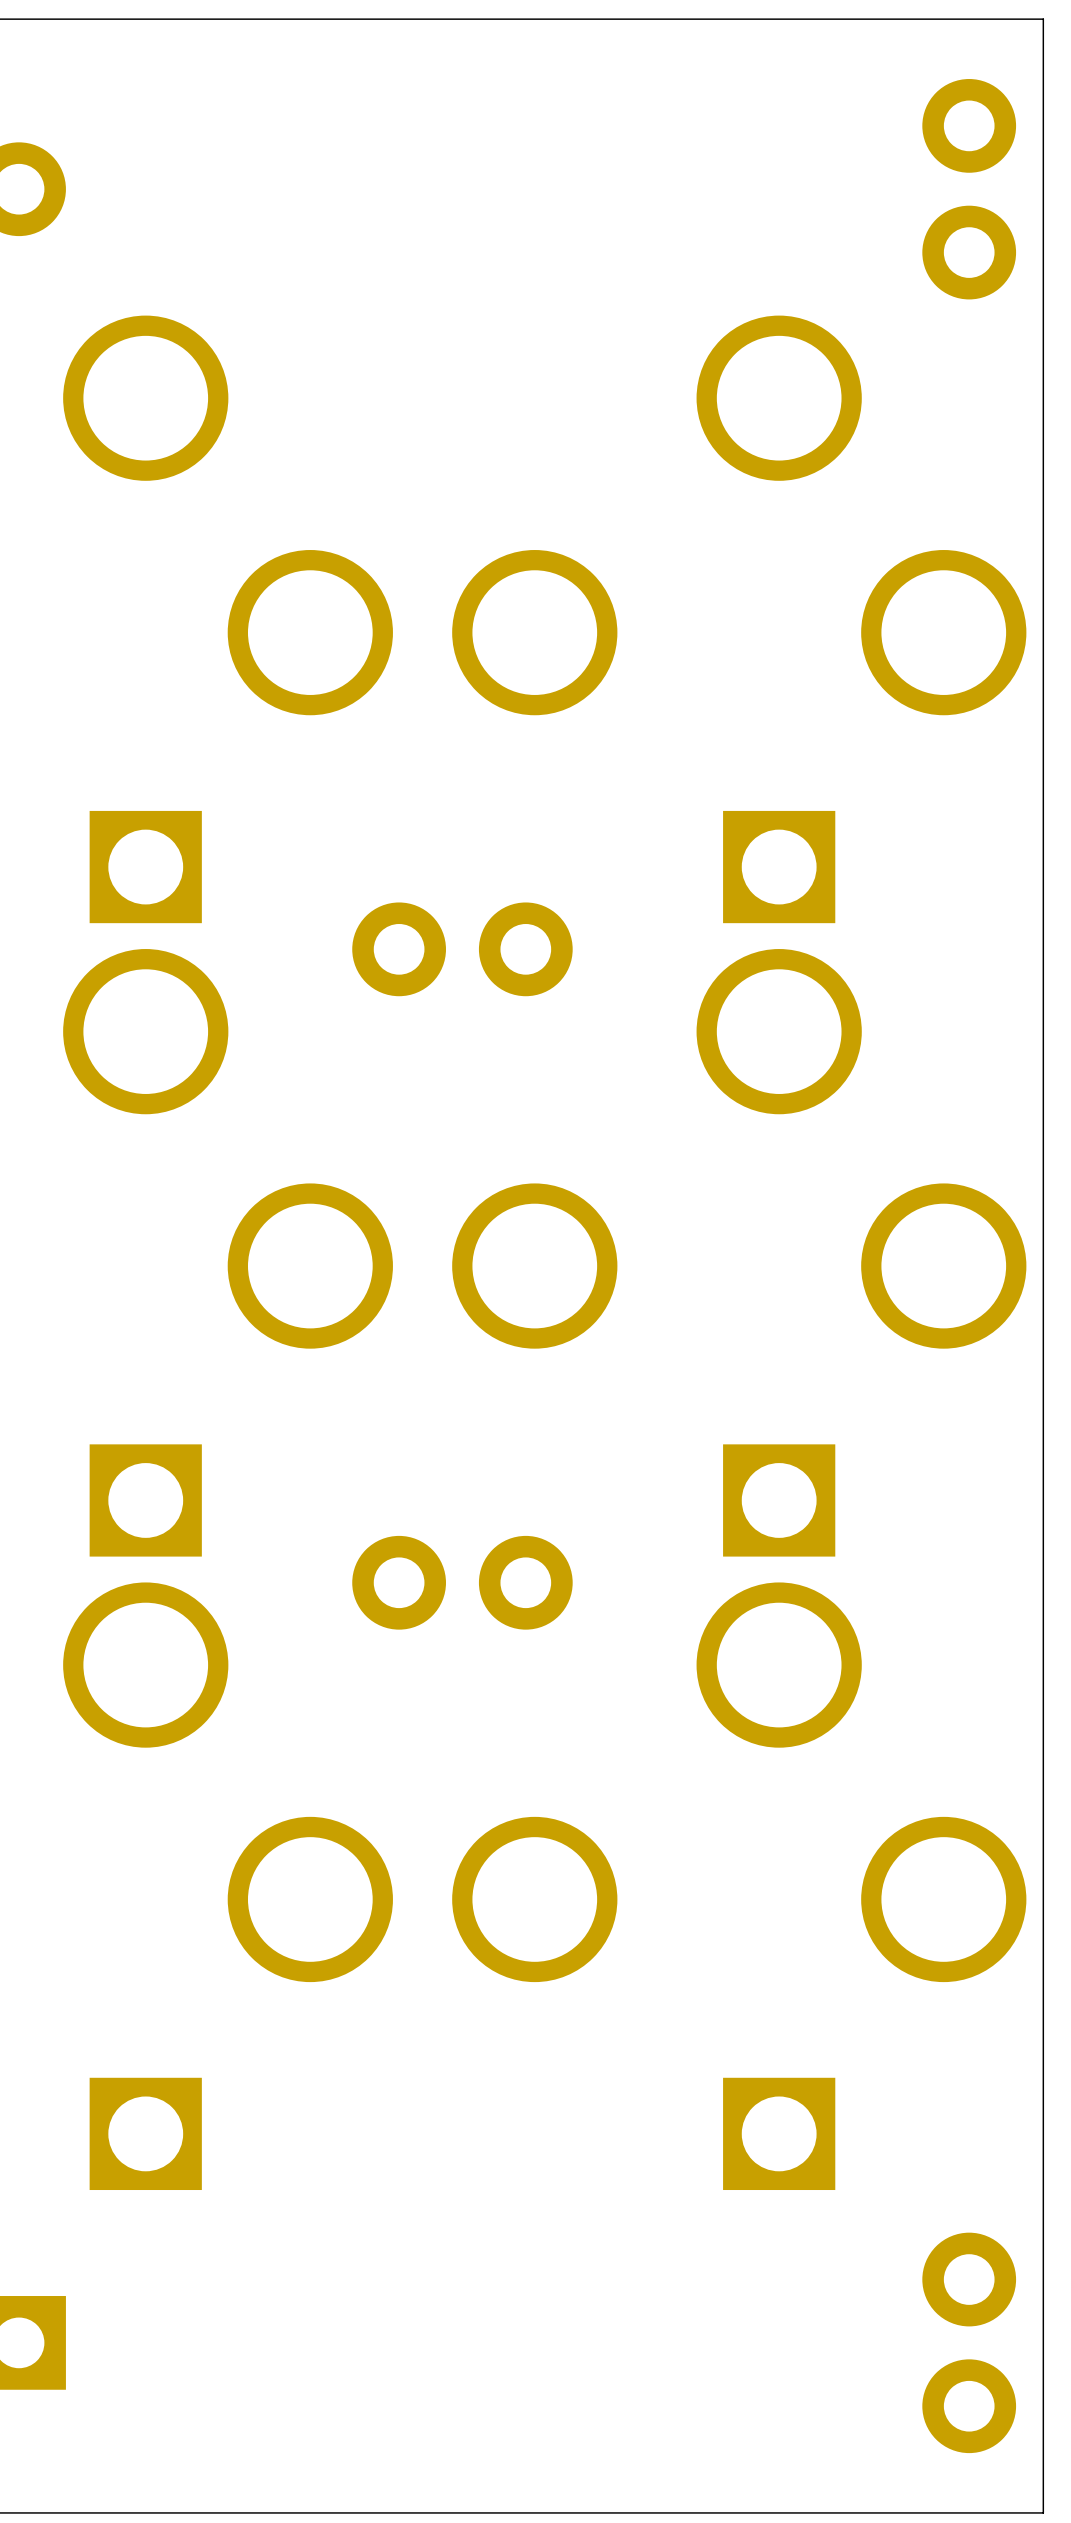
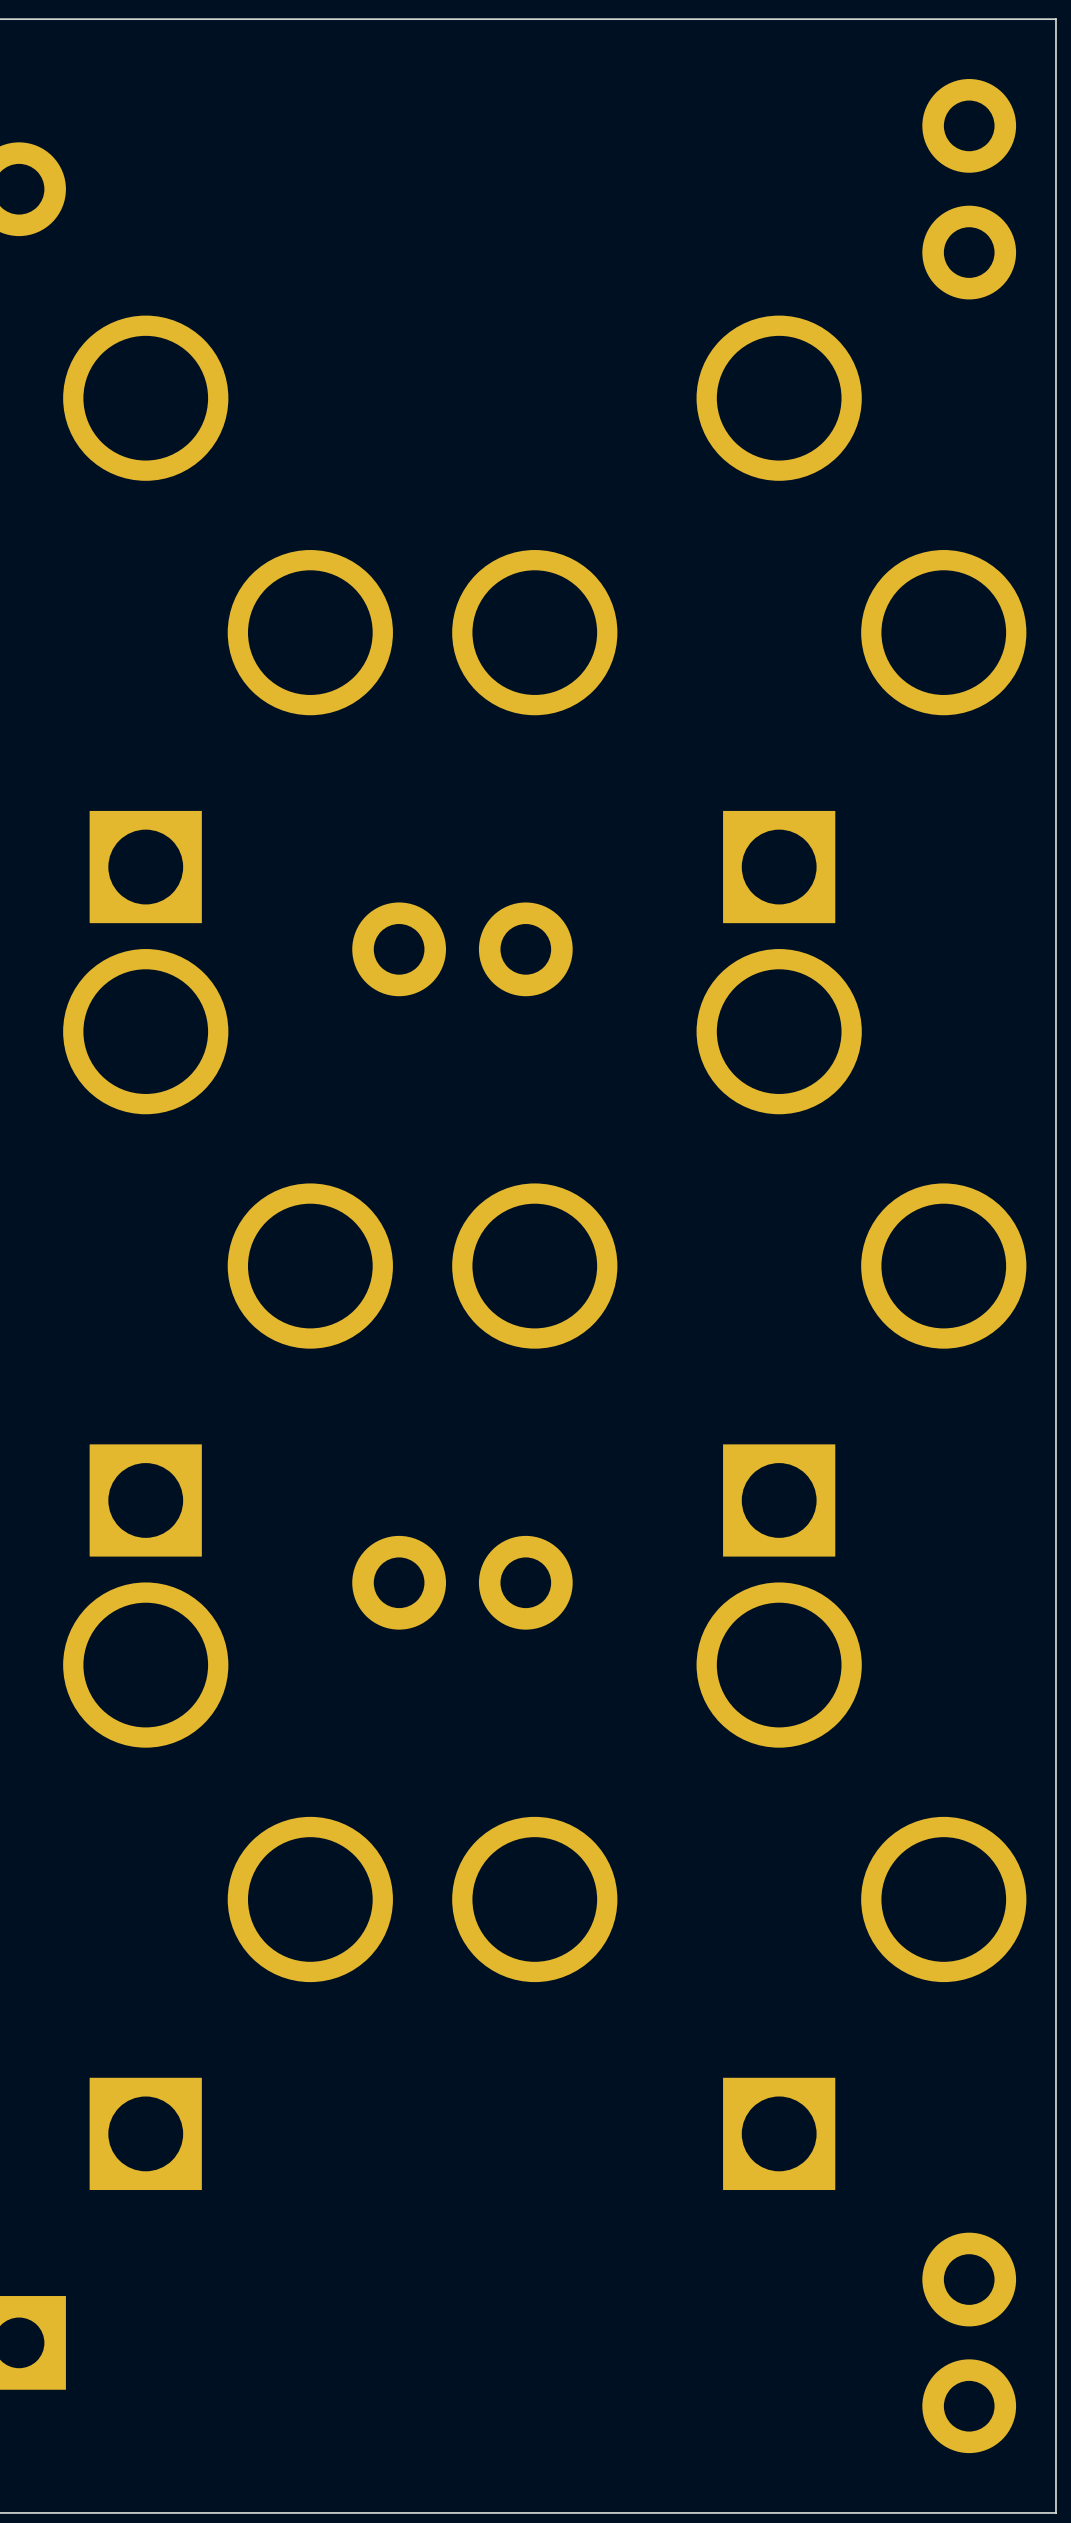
board edge: (1043, 19) (1043, 2512) -> (1043, 19) (1055, 19) (1055, 2512) (1043, 2512)

